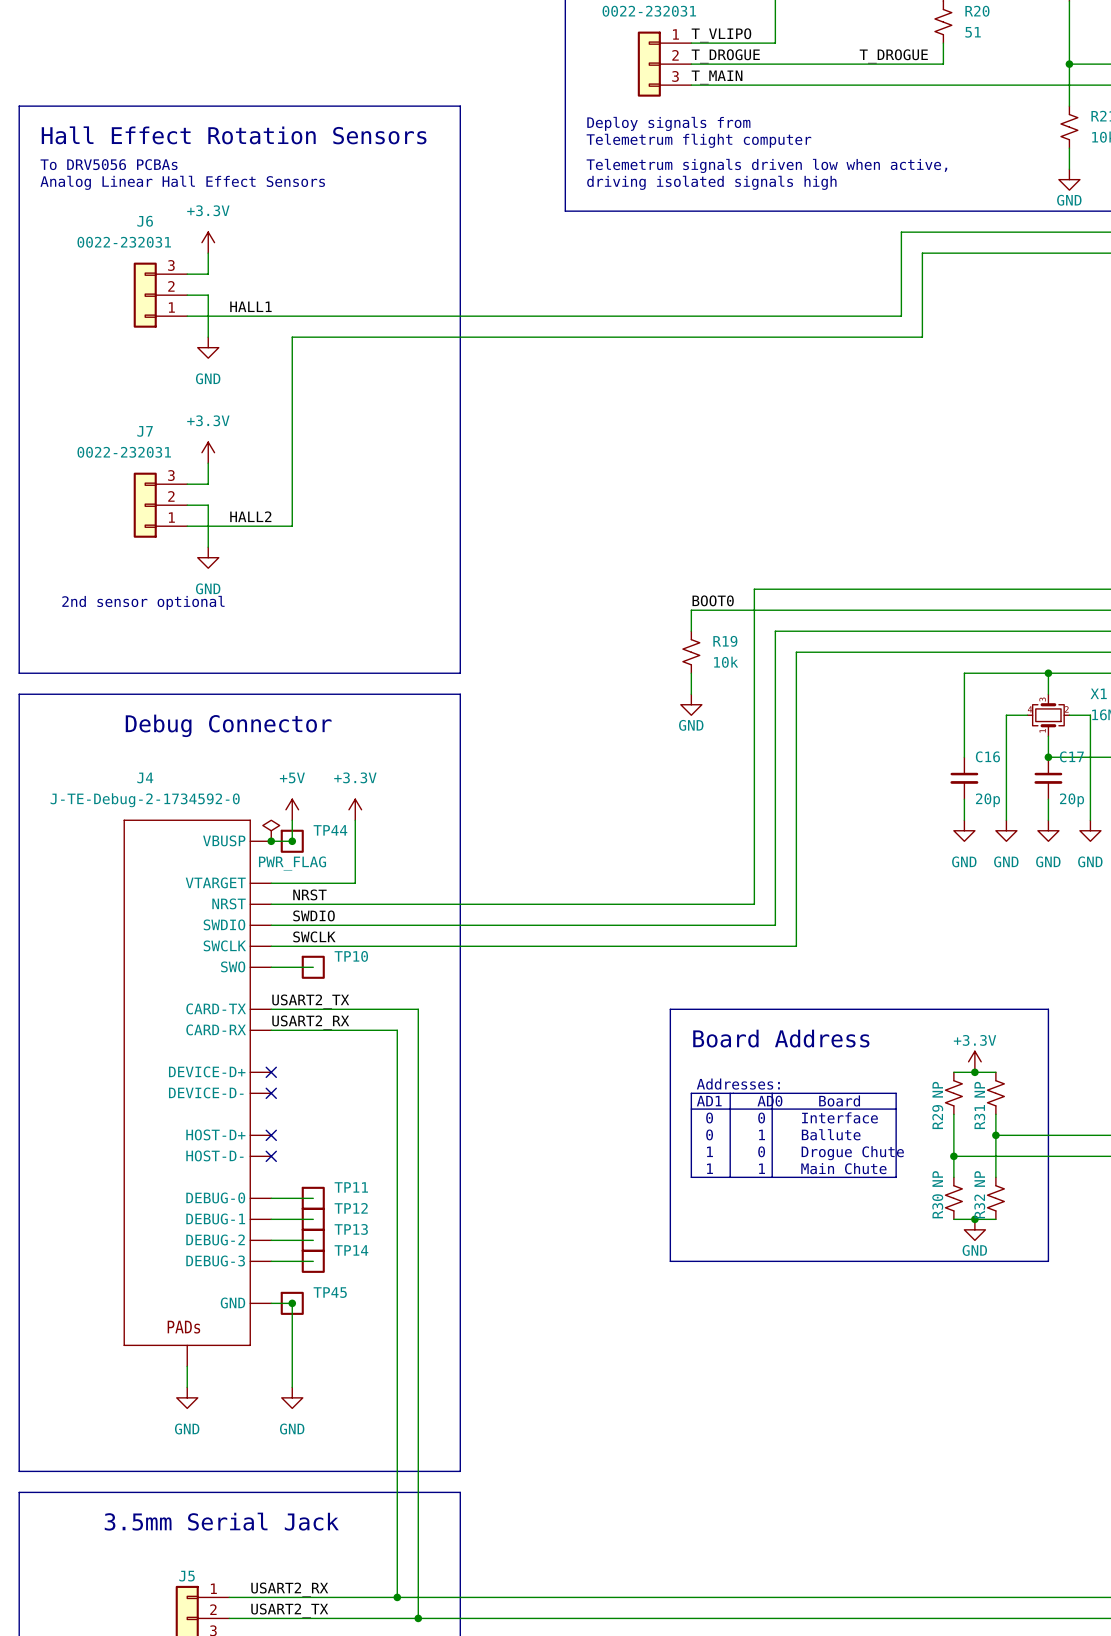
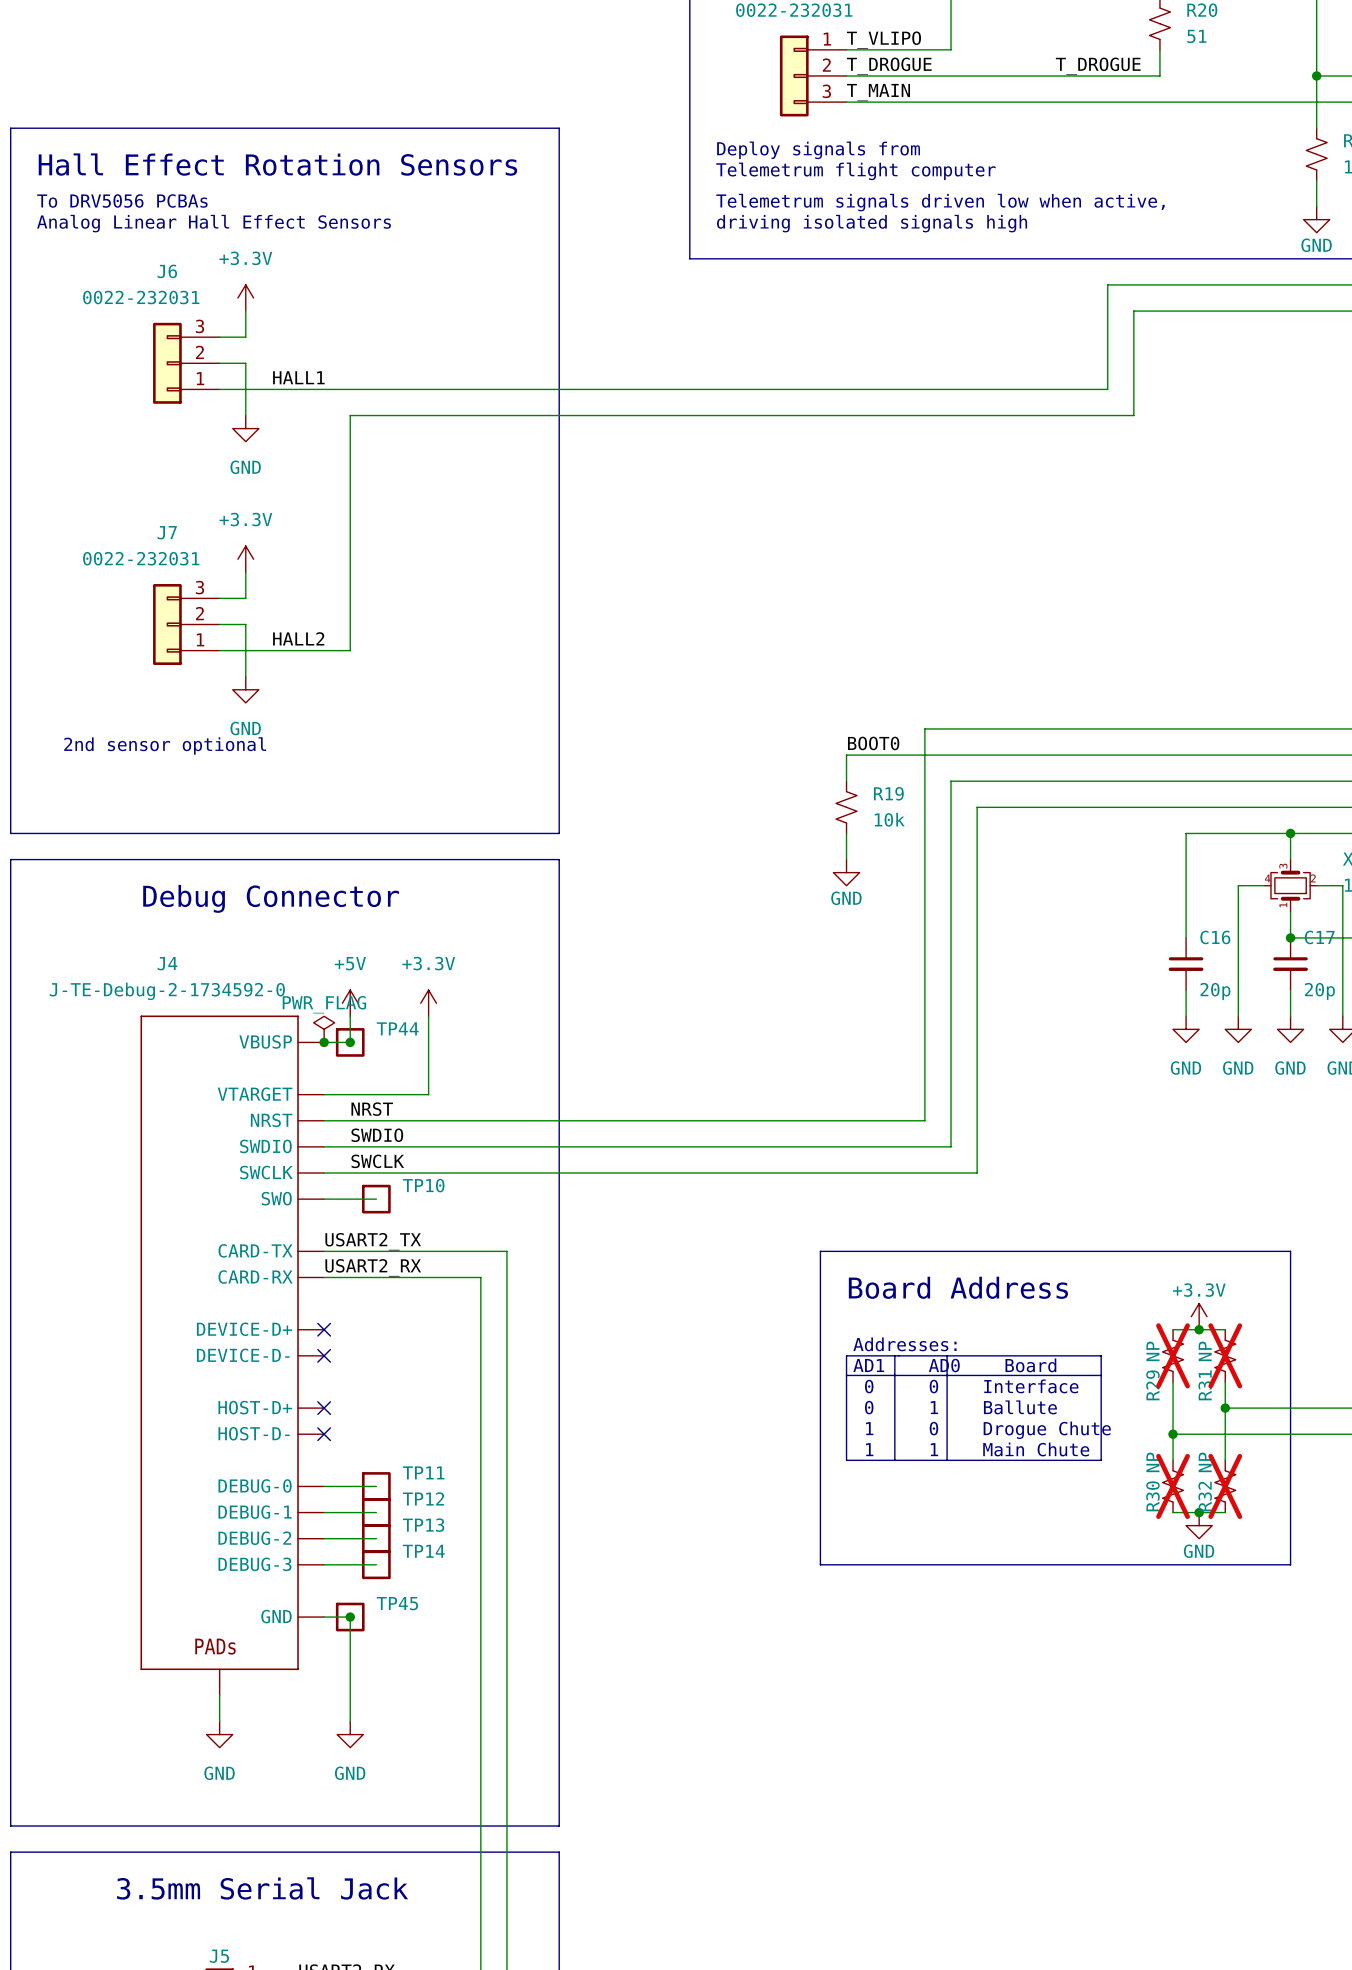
power symbol text position: PWR_FLAG (292, 863) -> PWR_FLAG (324, 1004)
R29 do-not-place cross: none -> (1173, 1355)
R31 do-not-place cross: none -> (1225, 1355)
R30 do-not-place cross: none -> (1173, 1486)
R32 do-not-place cross: none -> (1225, 1486)

